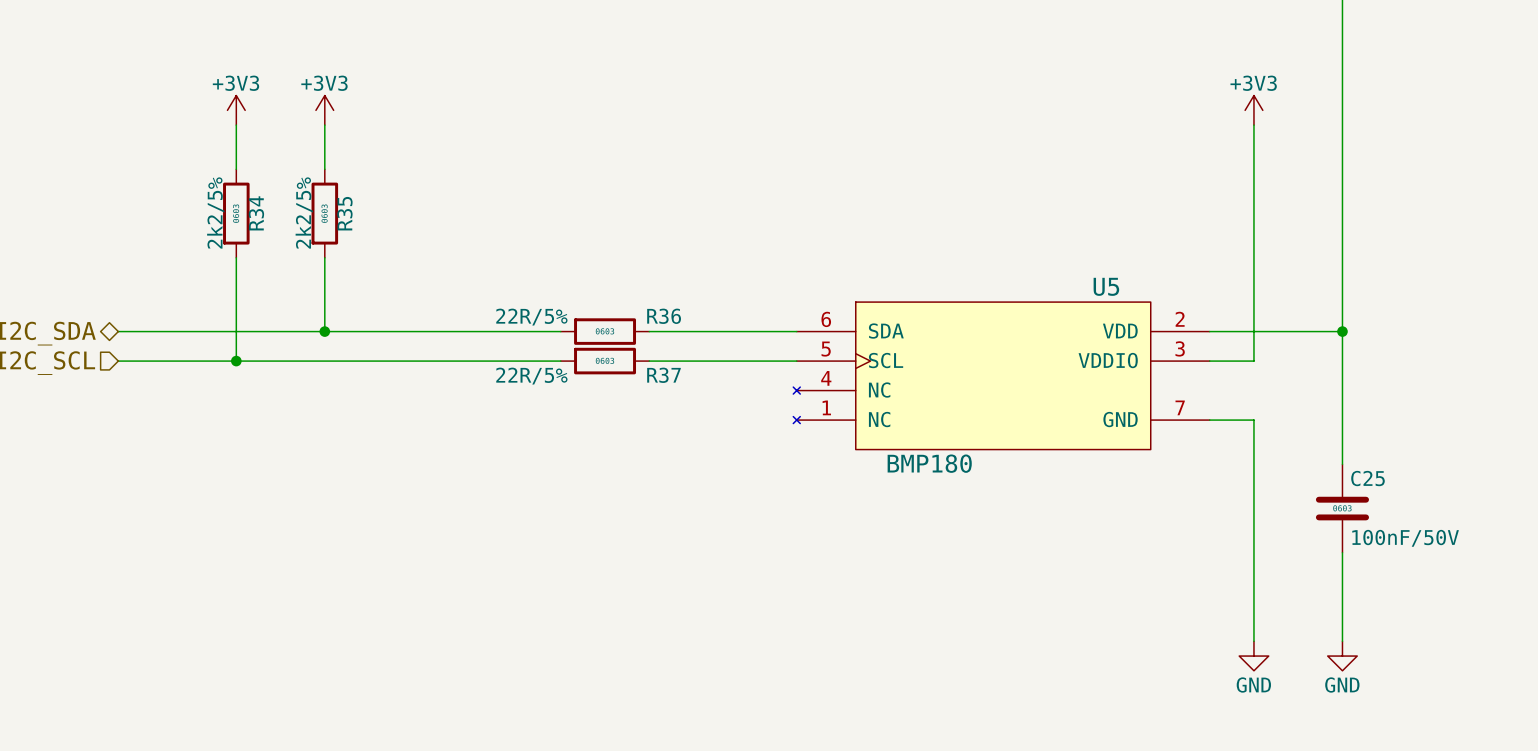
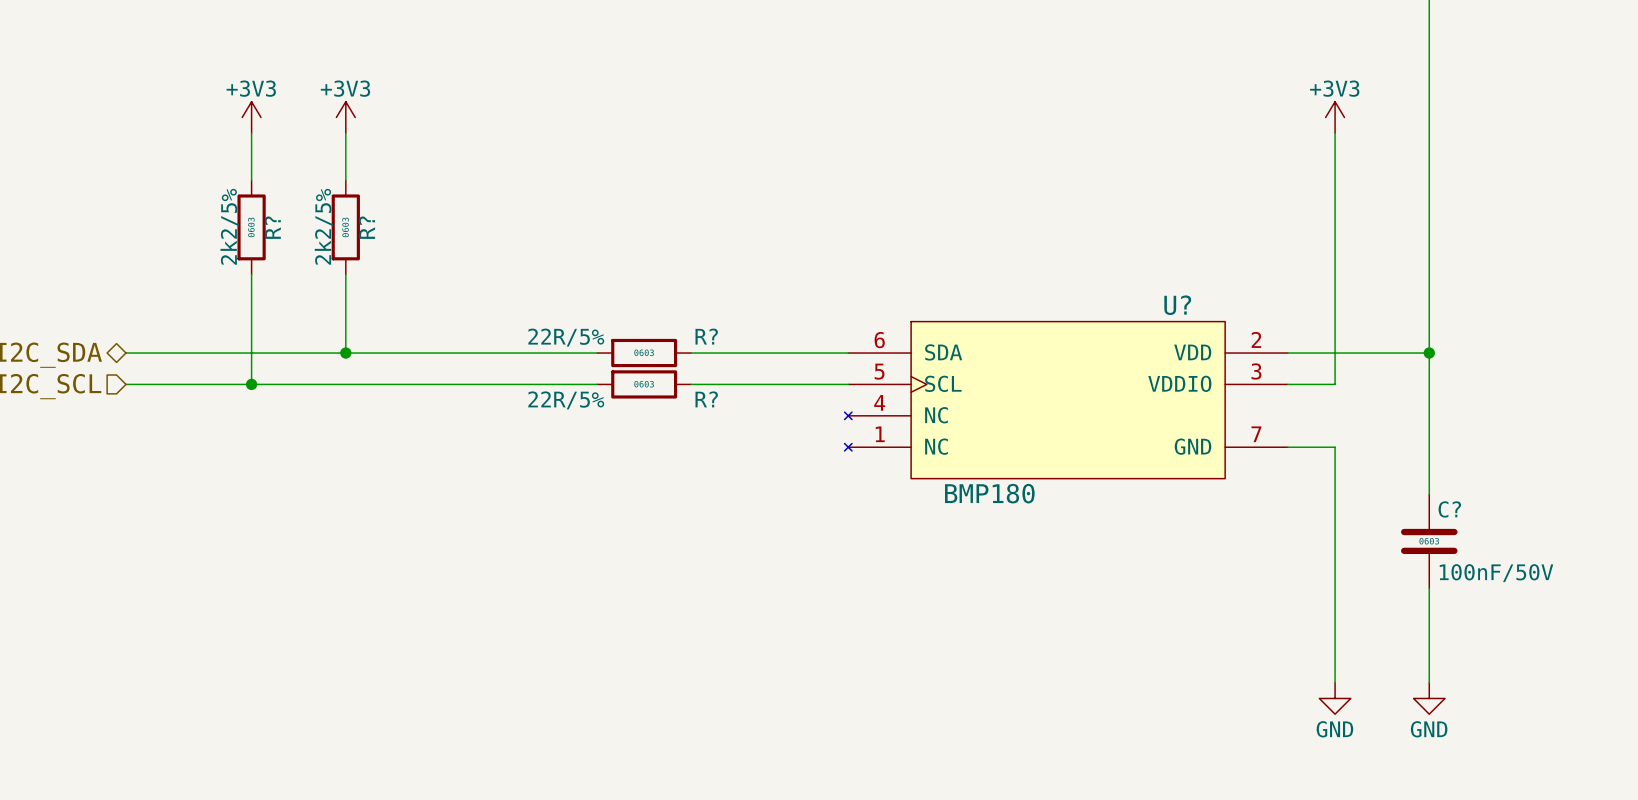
R34 name: R34 (256, 213) -> R? (272, 227)
R35 name: R35 (344, 213) -> R? (367, 227)
U5 name: U5 (1106, 286) -> U? (1177, 305)
R36 name: R36 (664, 316) -> R? (706, 336)
R37 name: R37 (663, 375) -> R? (706, 399)
C25 name: C25 (1367, 478) -> C? (1449, 509)

